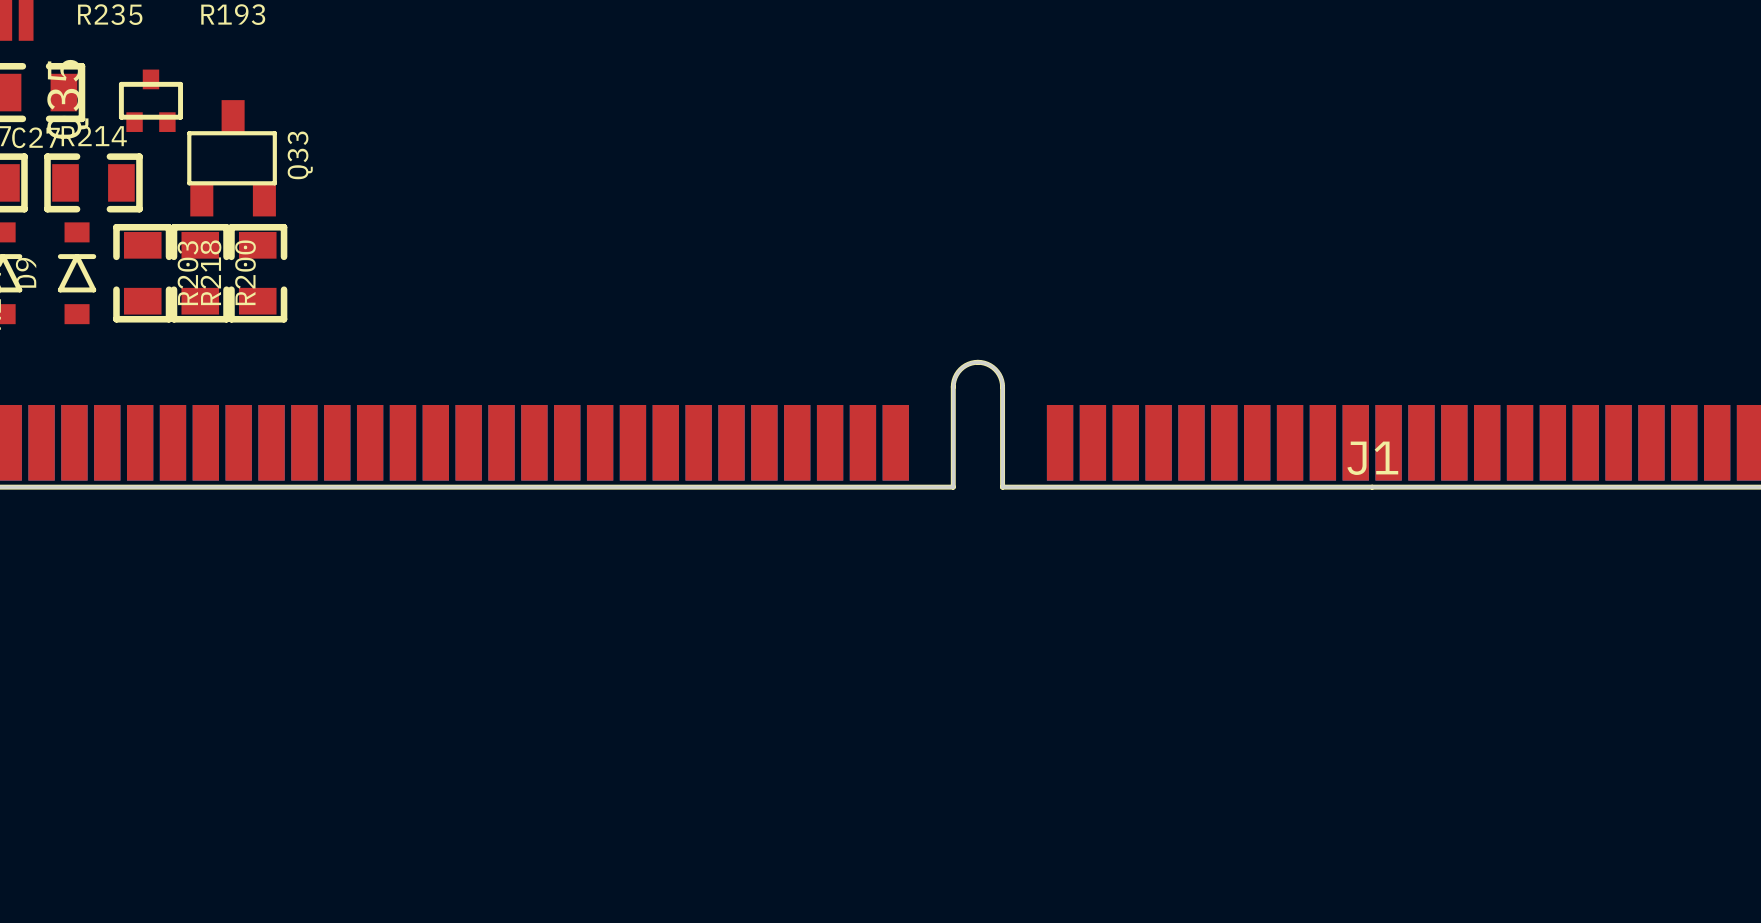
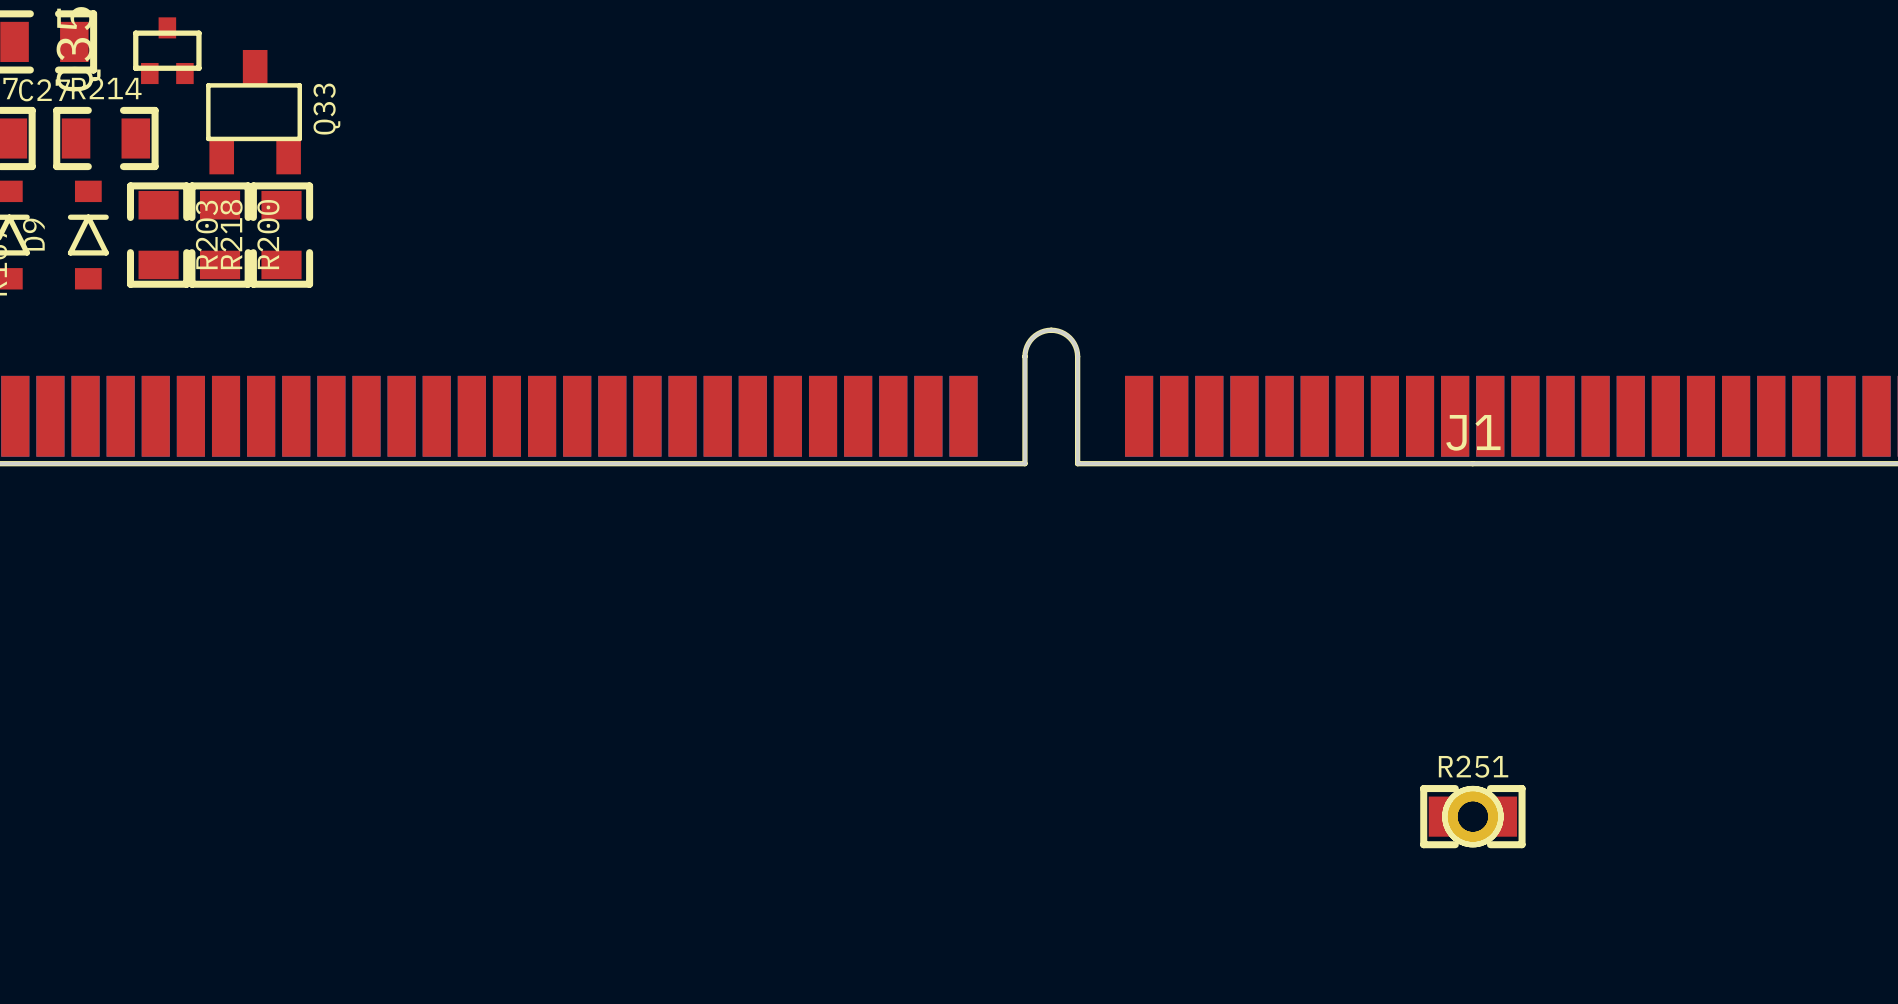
R251: none -> (1472, 816)
part: none -> (1472, 816)

